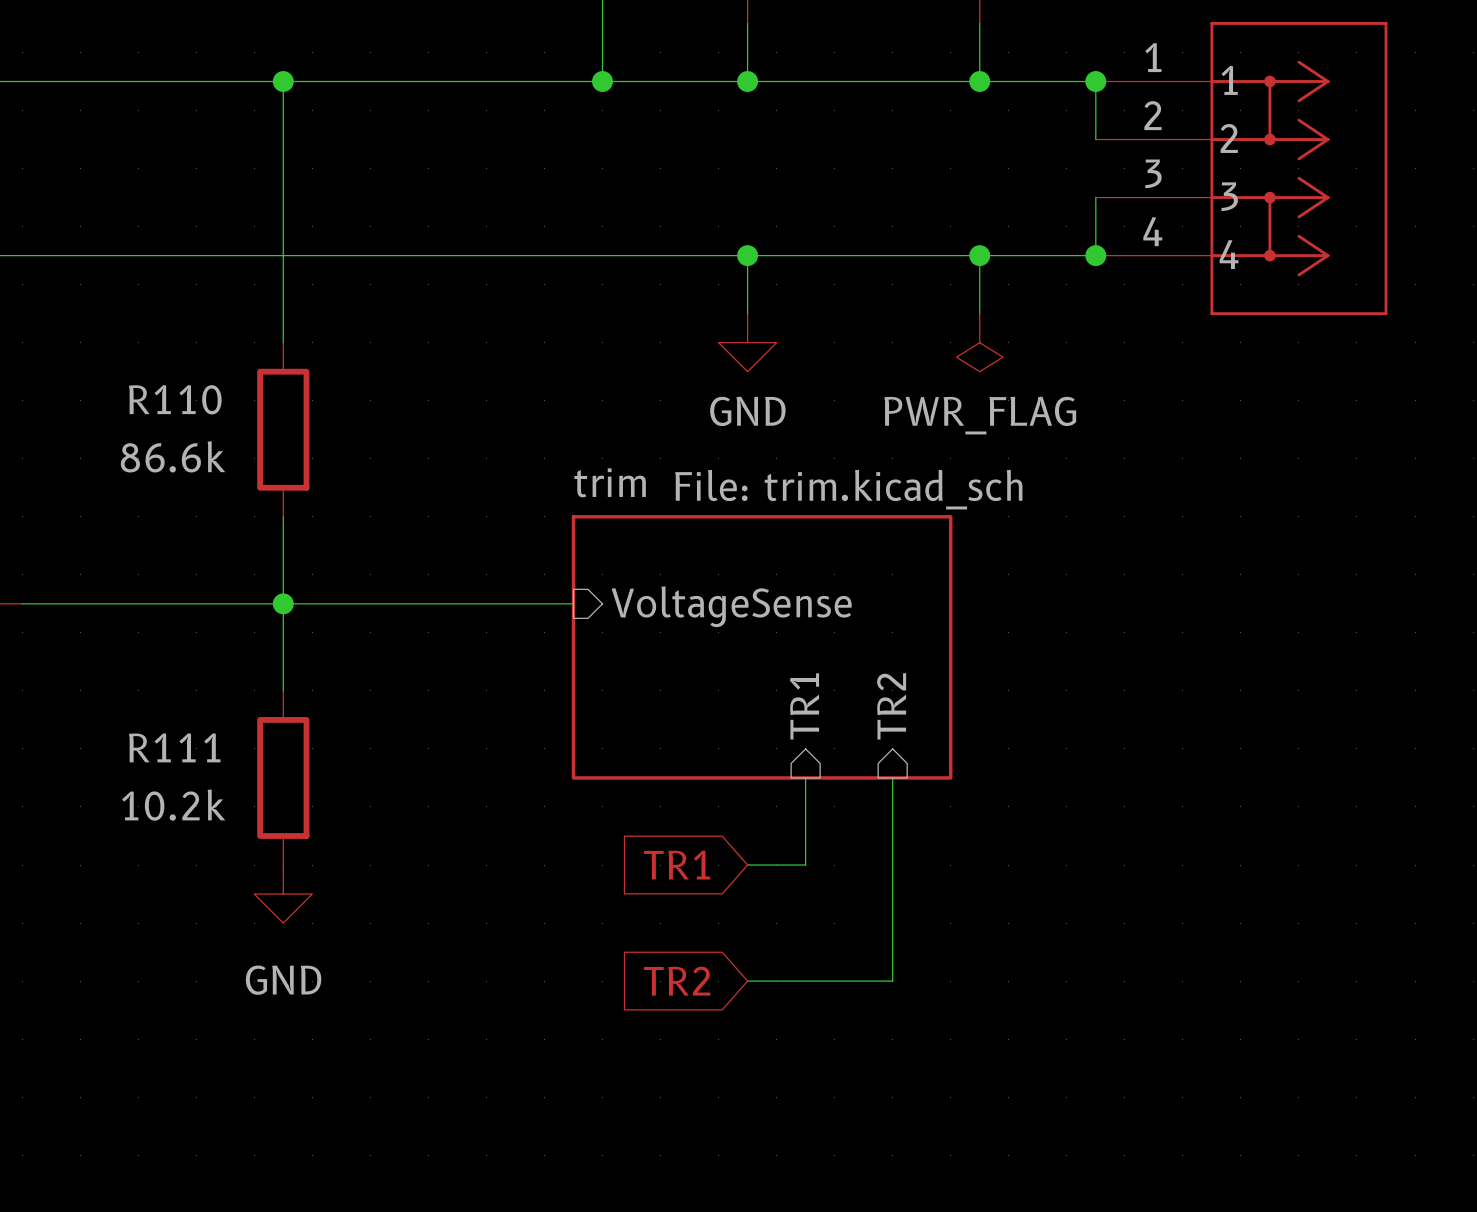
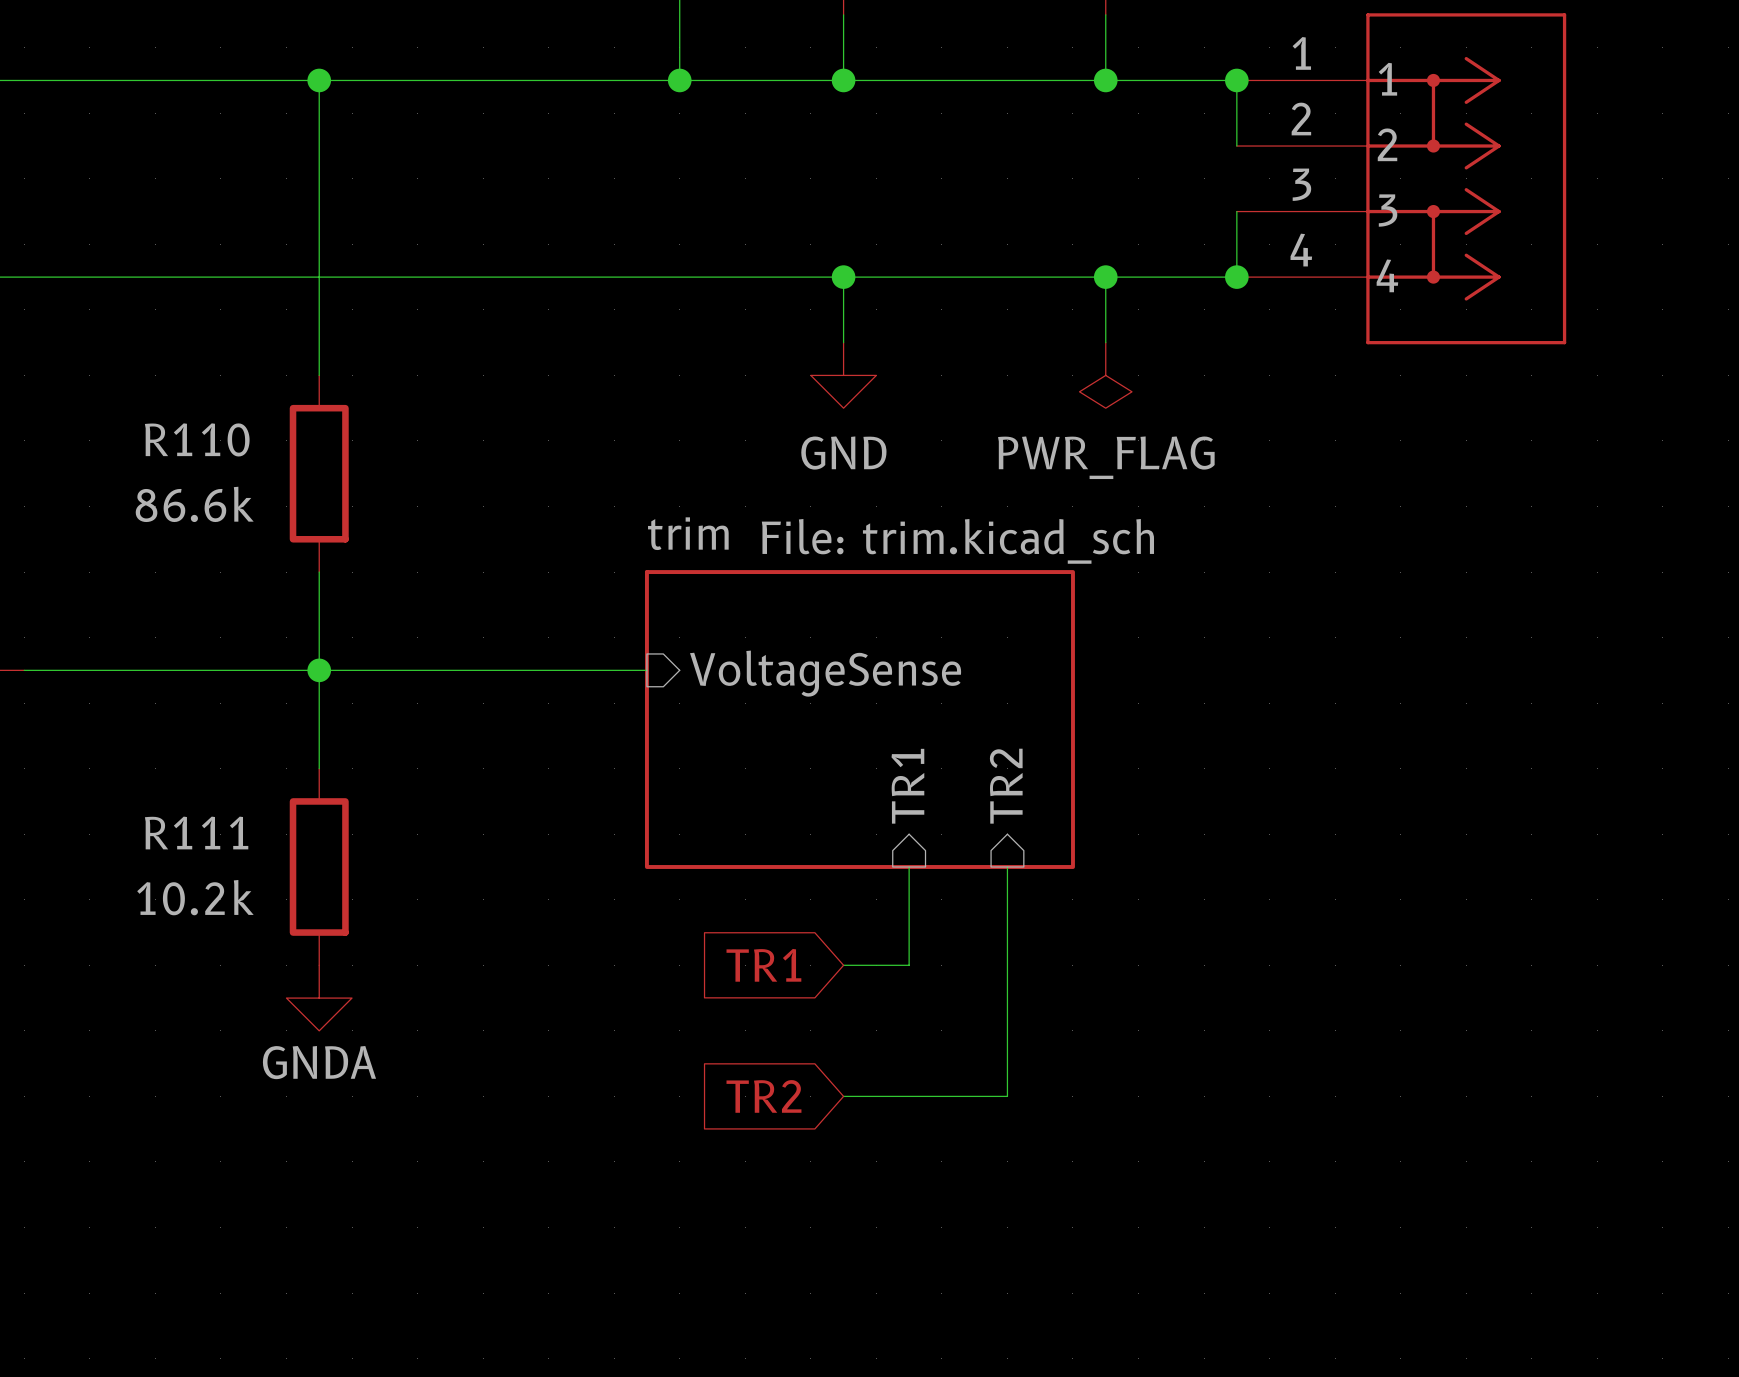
power symbol: GND (283, 894) -> GNDA (319, 998)

